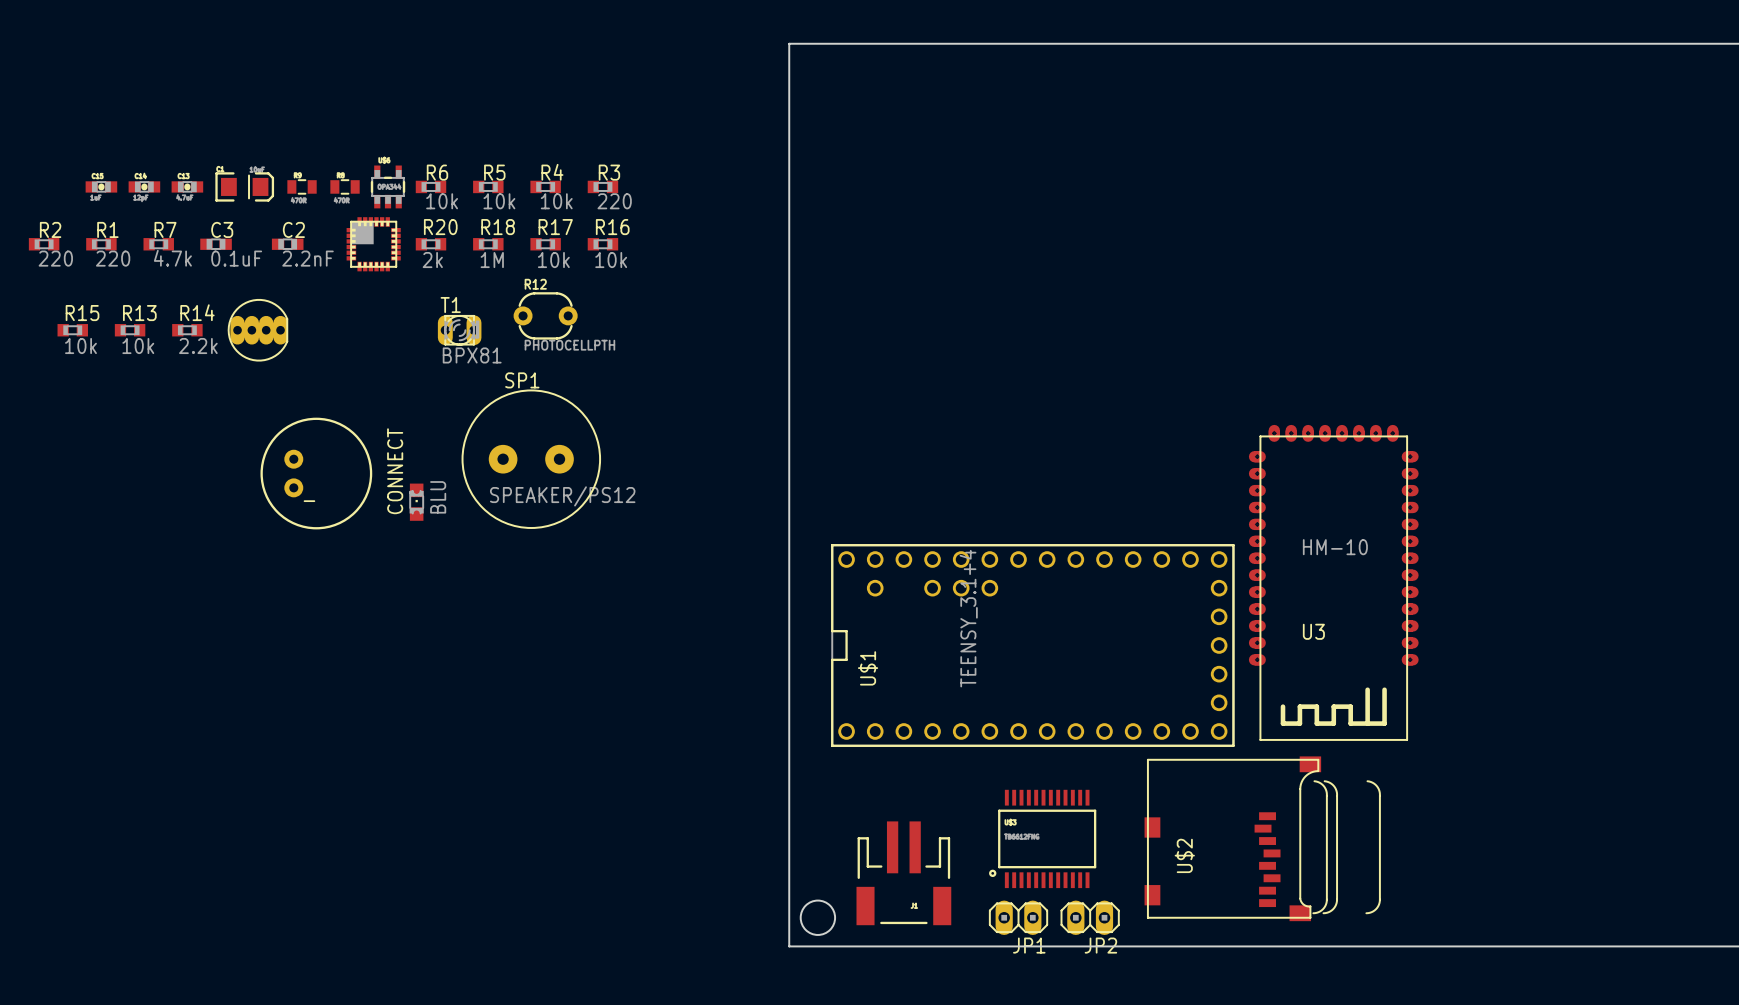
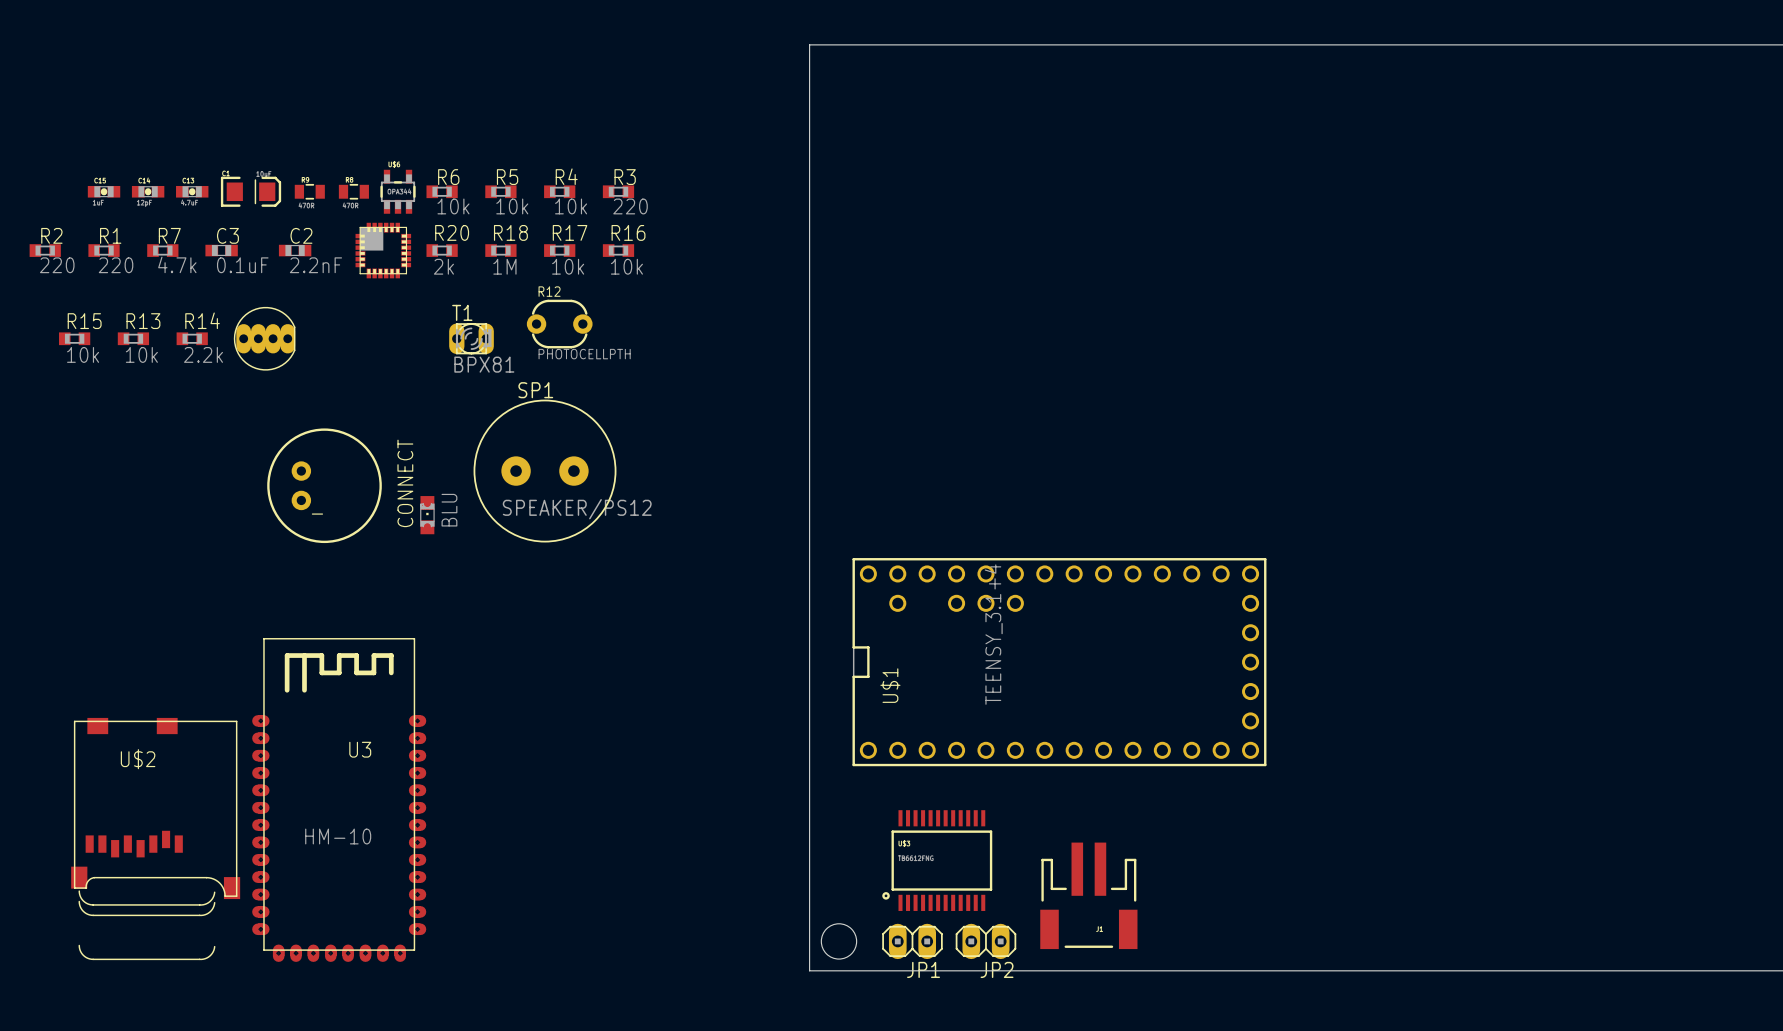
U3 rotation: 0° (1333, 582) -> 180° (339, 799)
U3 position: (1333, 582) -> (339, 799)
part position: (1042, 838) -> (937, 860)
U$2 rotation: 0° (1262, 838) -> 90° clockwise (155, 839)
U$2 position: (1262, 838) -> (155, 839)
part position: (903, 873) -> (1088, 895)
JP1 position: (1018, 917) -> (912, 941)
JP2 position: (1090, 917) -> (985, 941)

